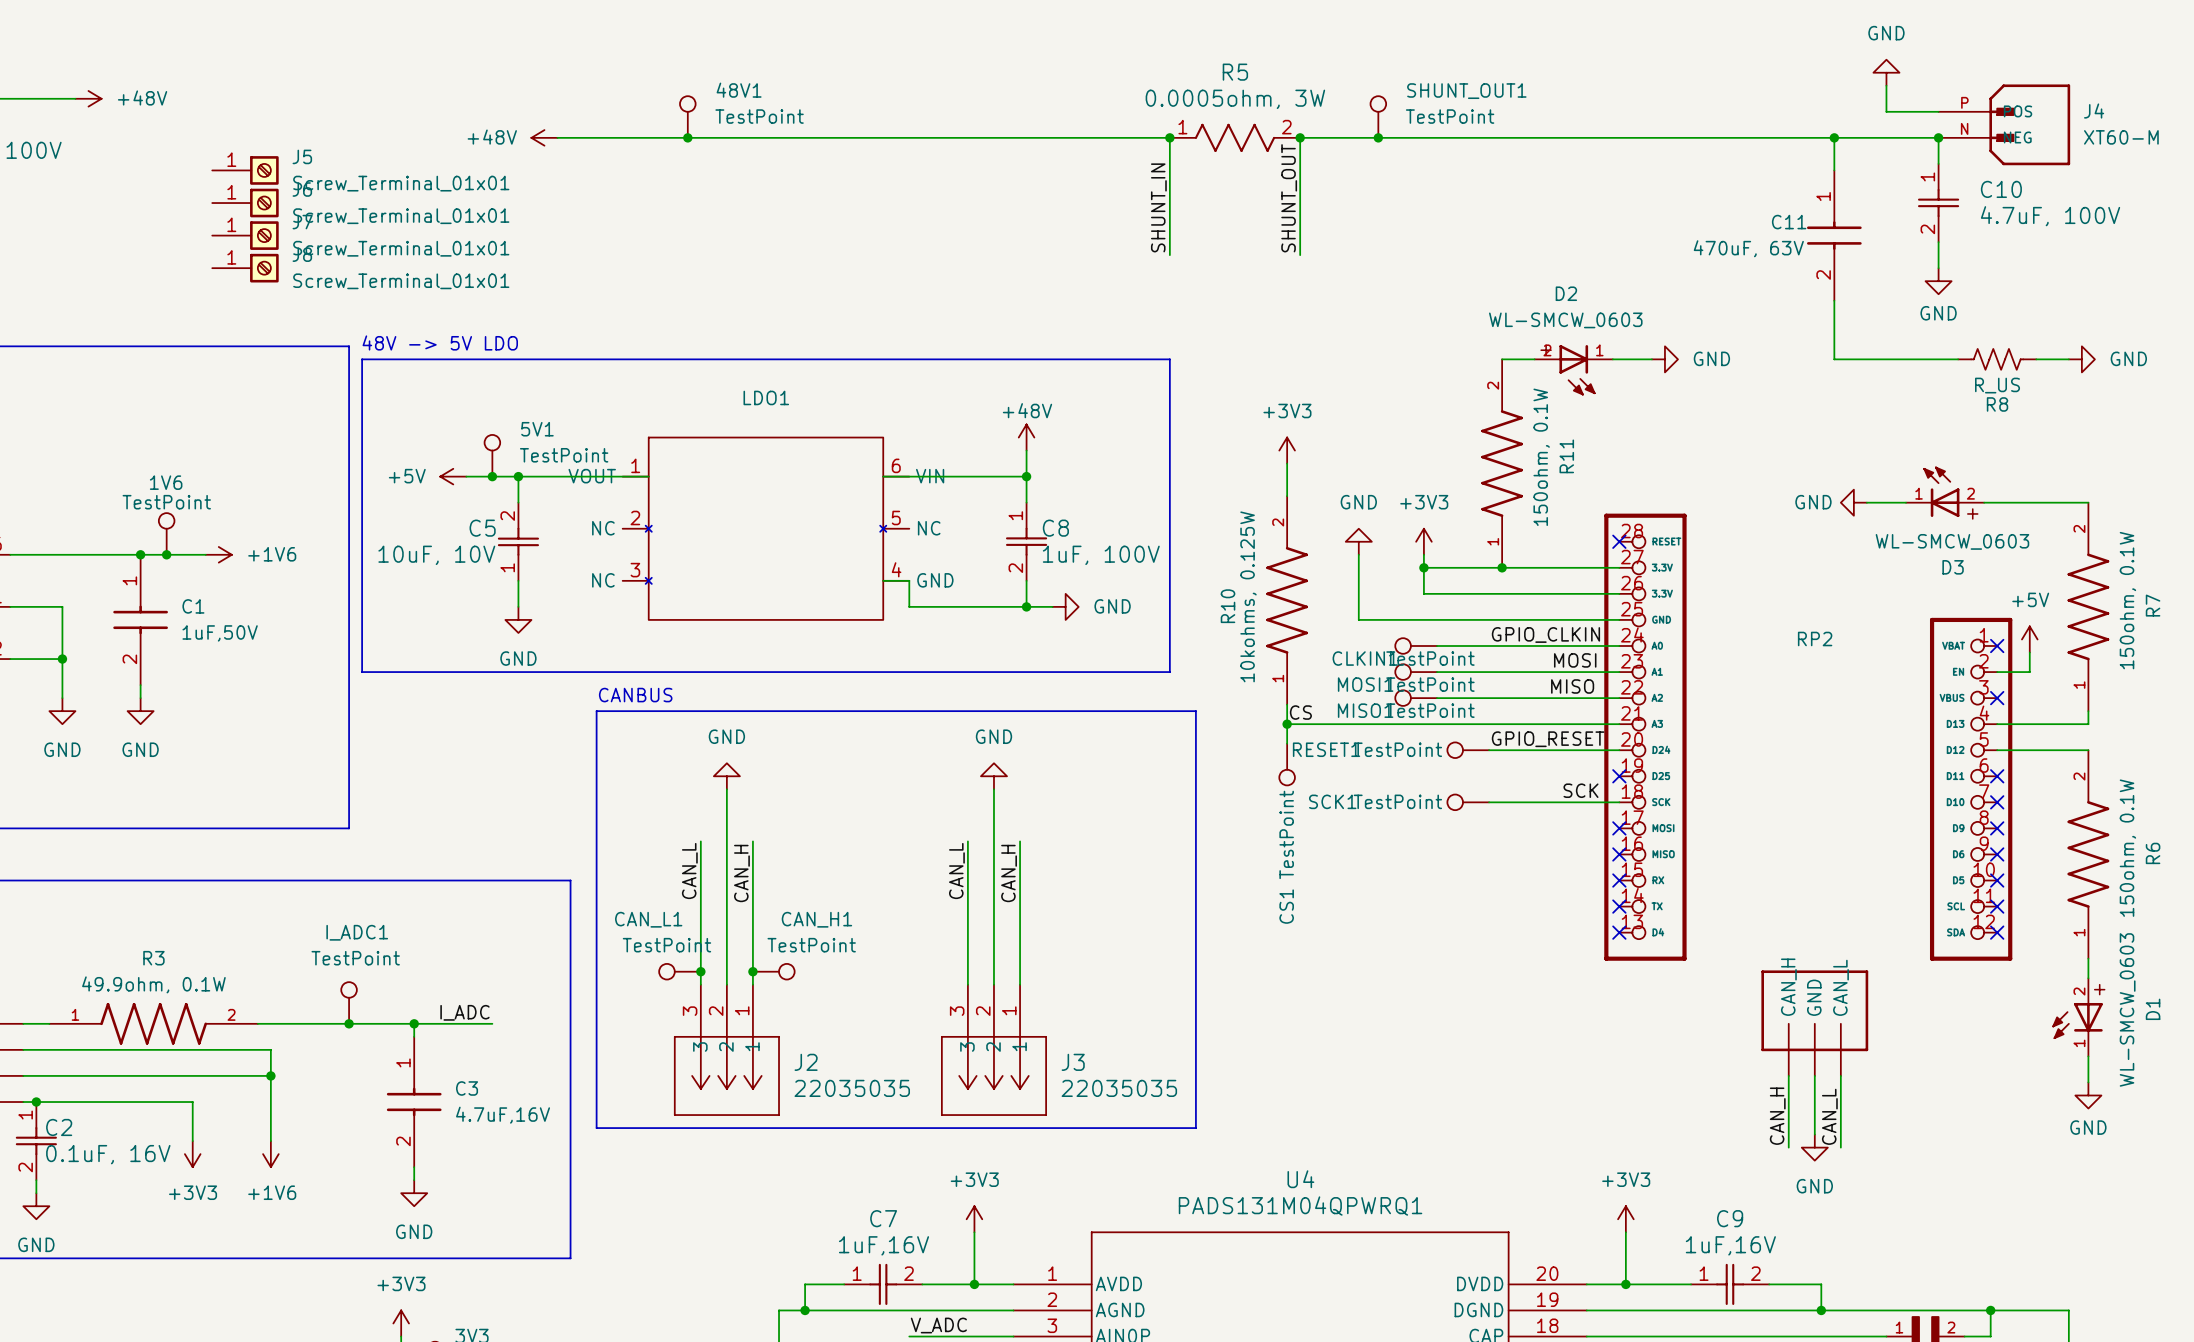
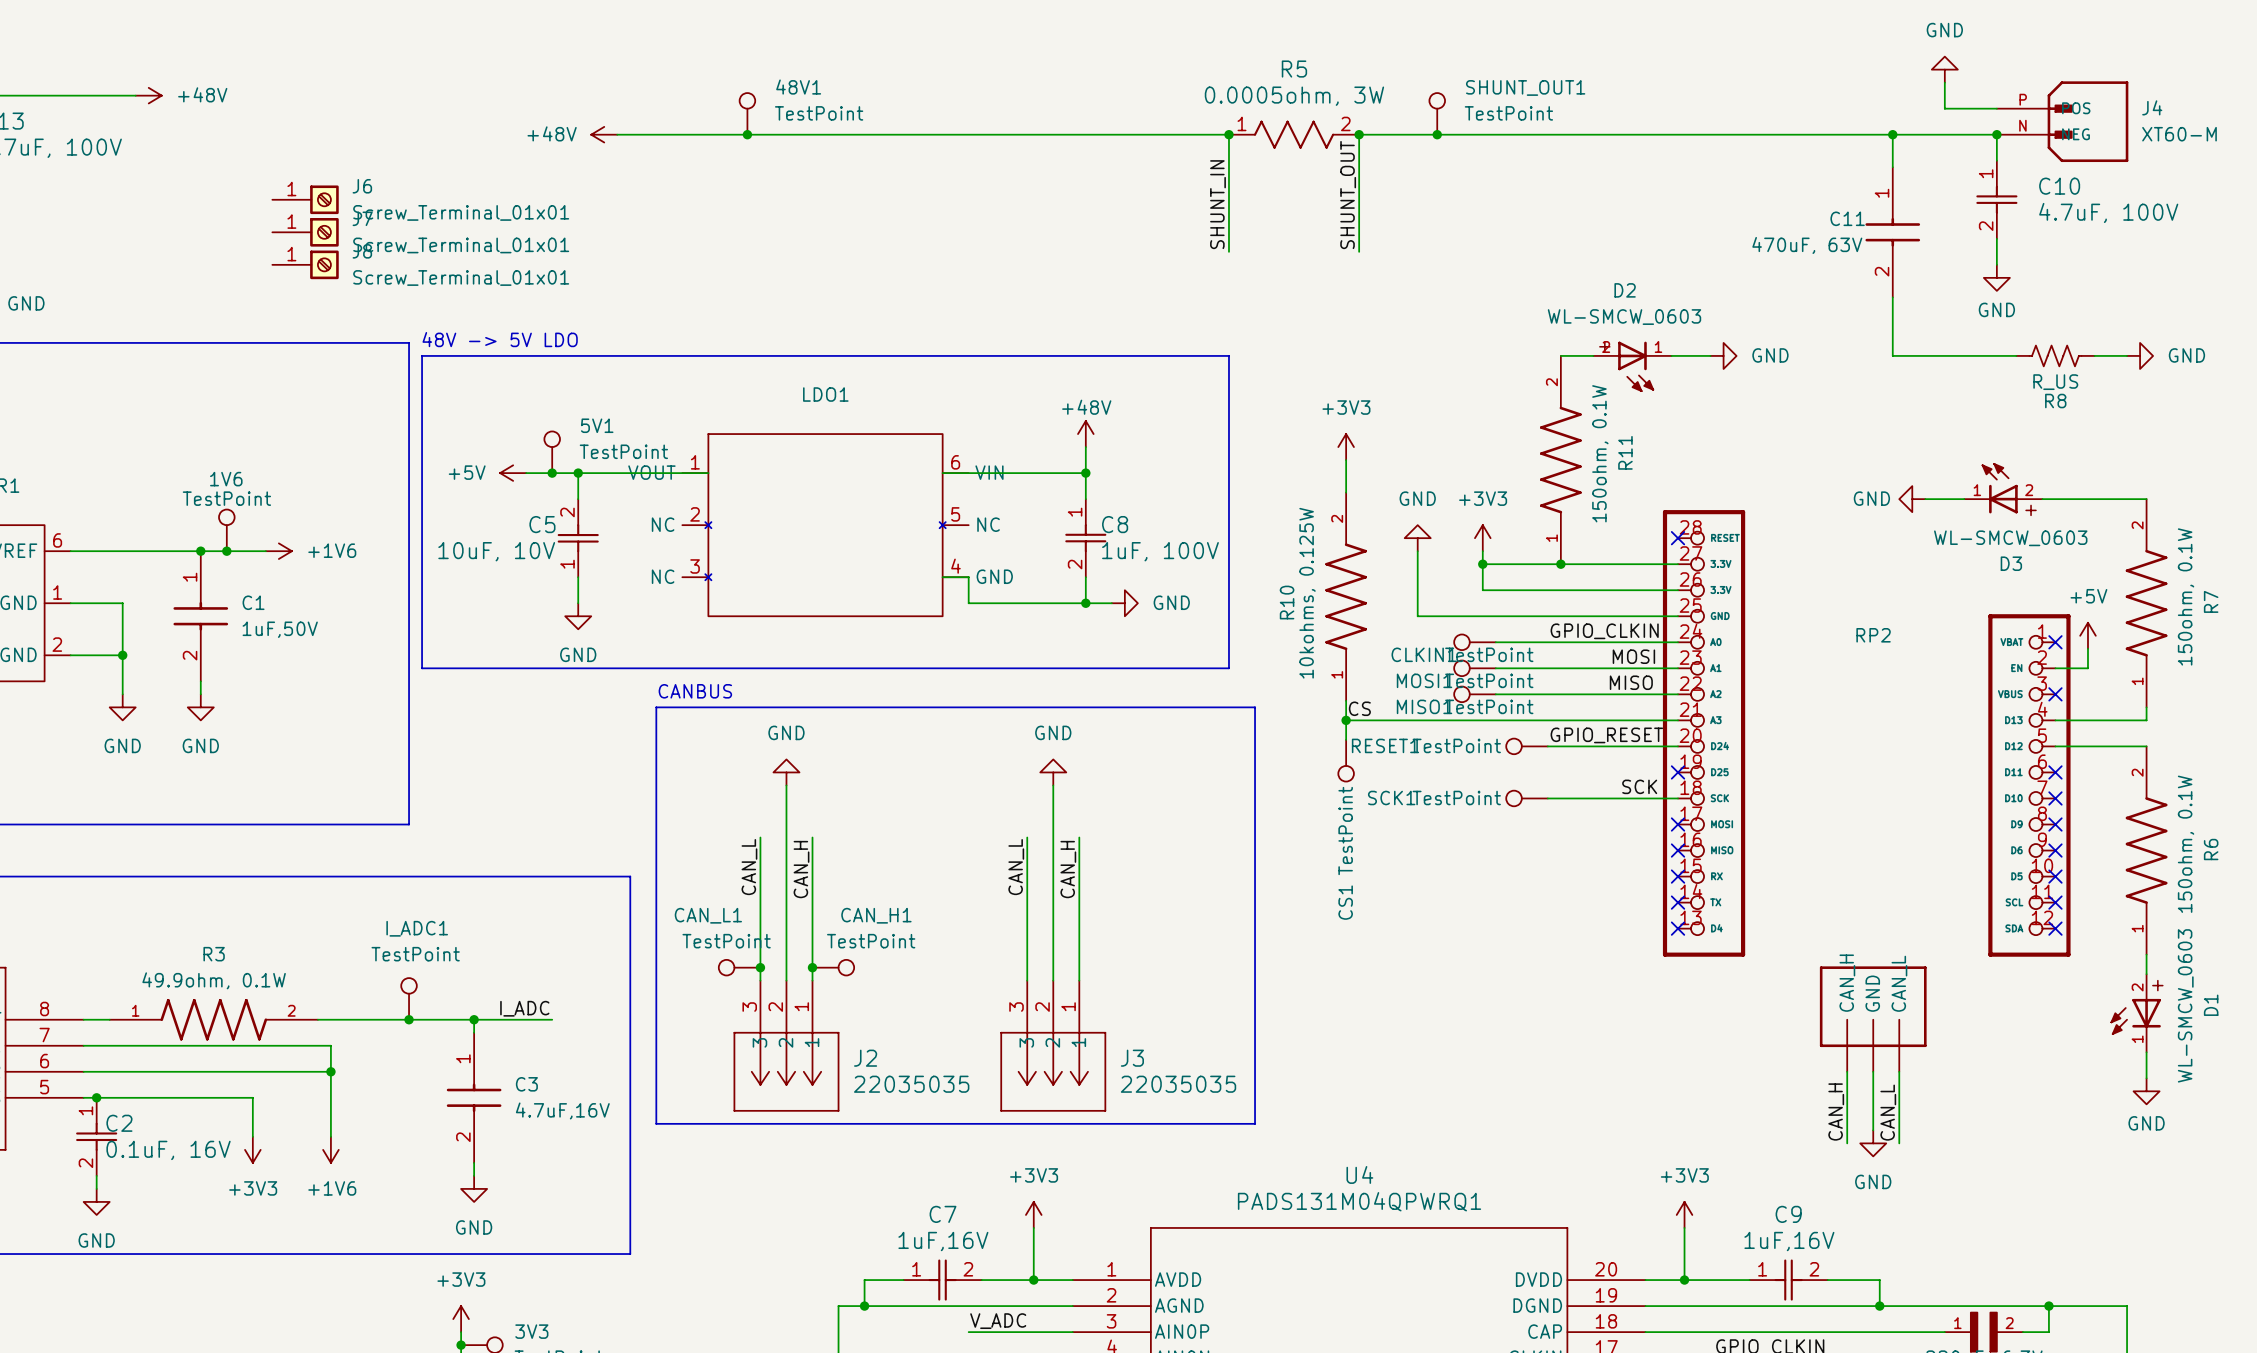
J5: Screw_Terminal_01x01 (245, 170) -> none

